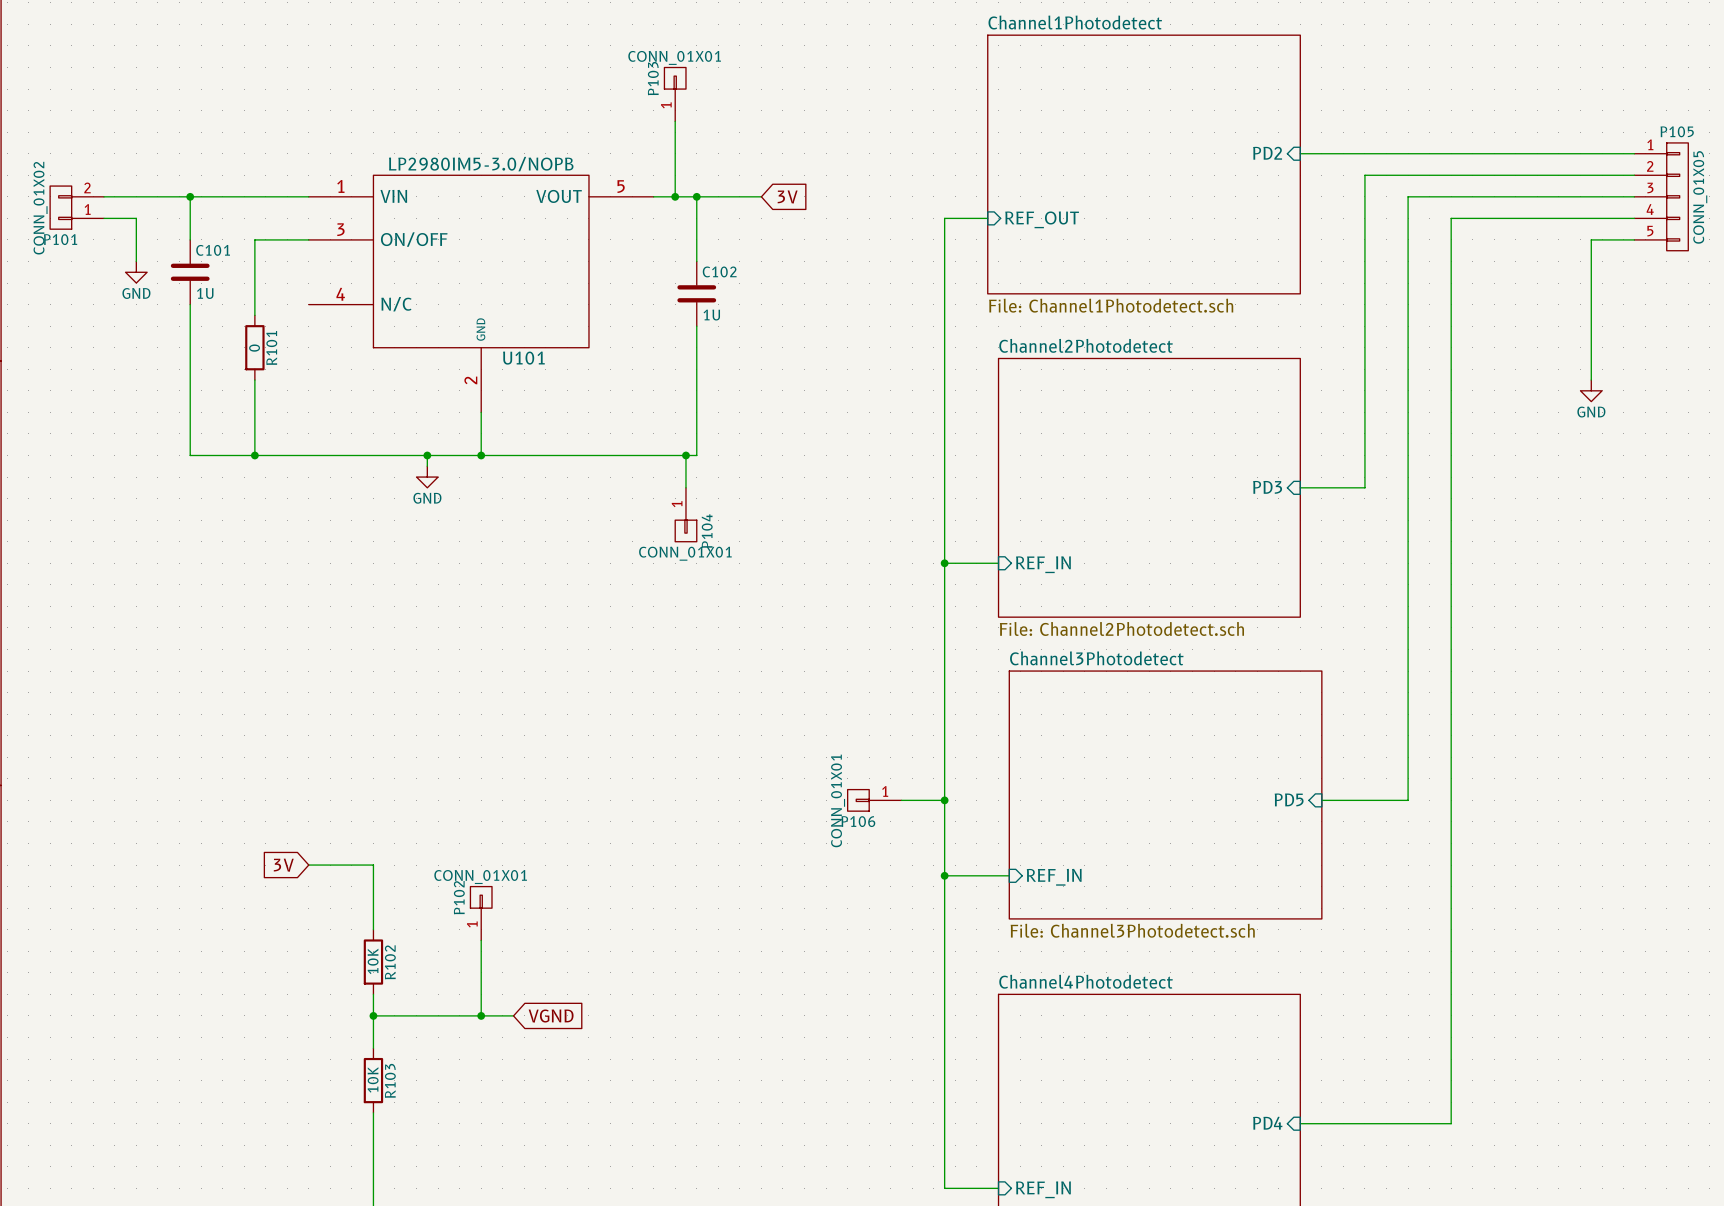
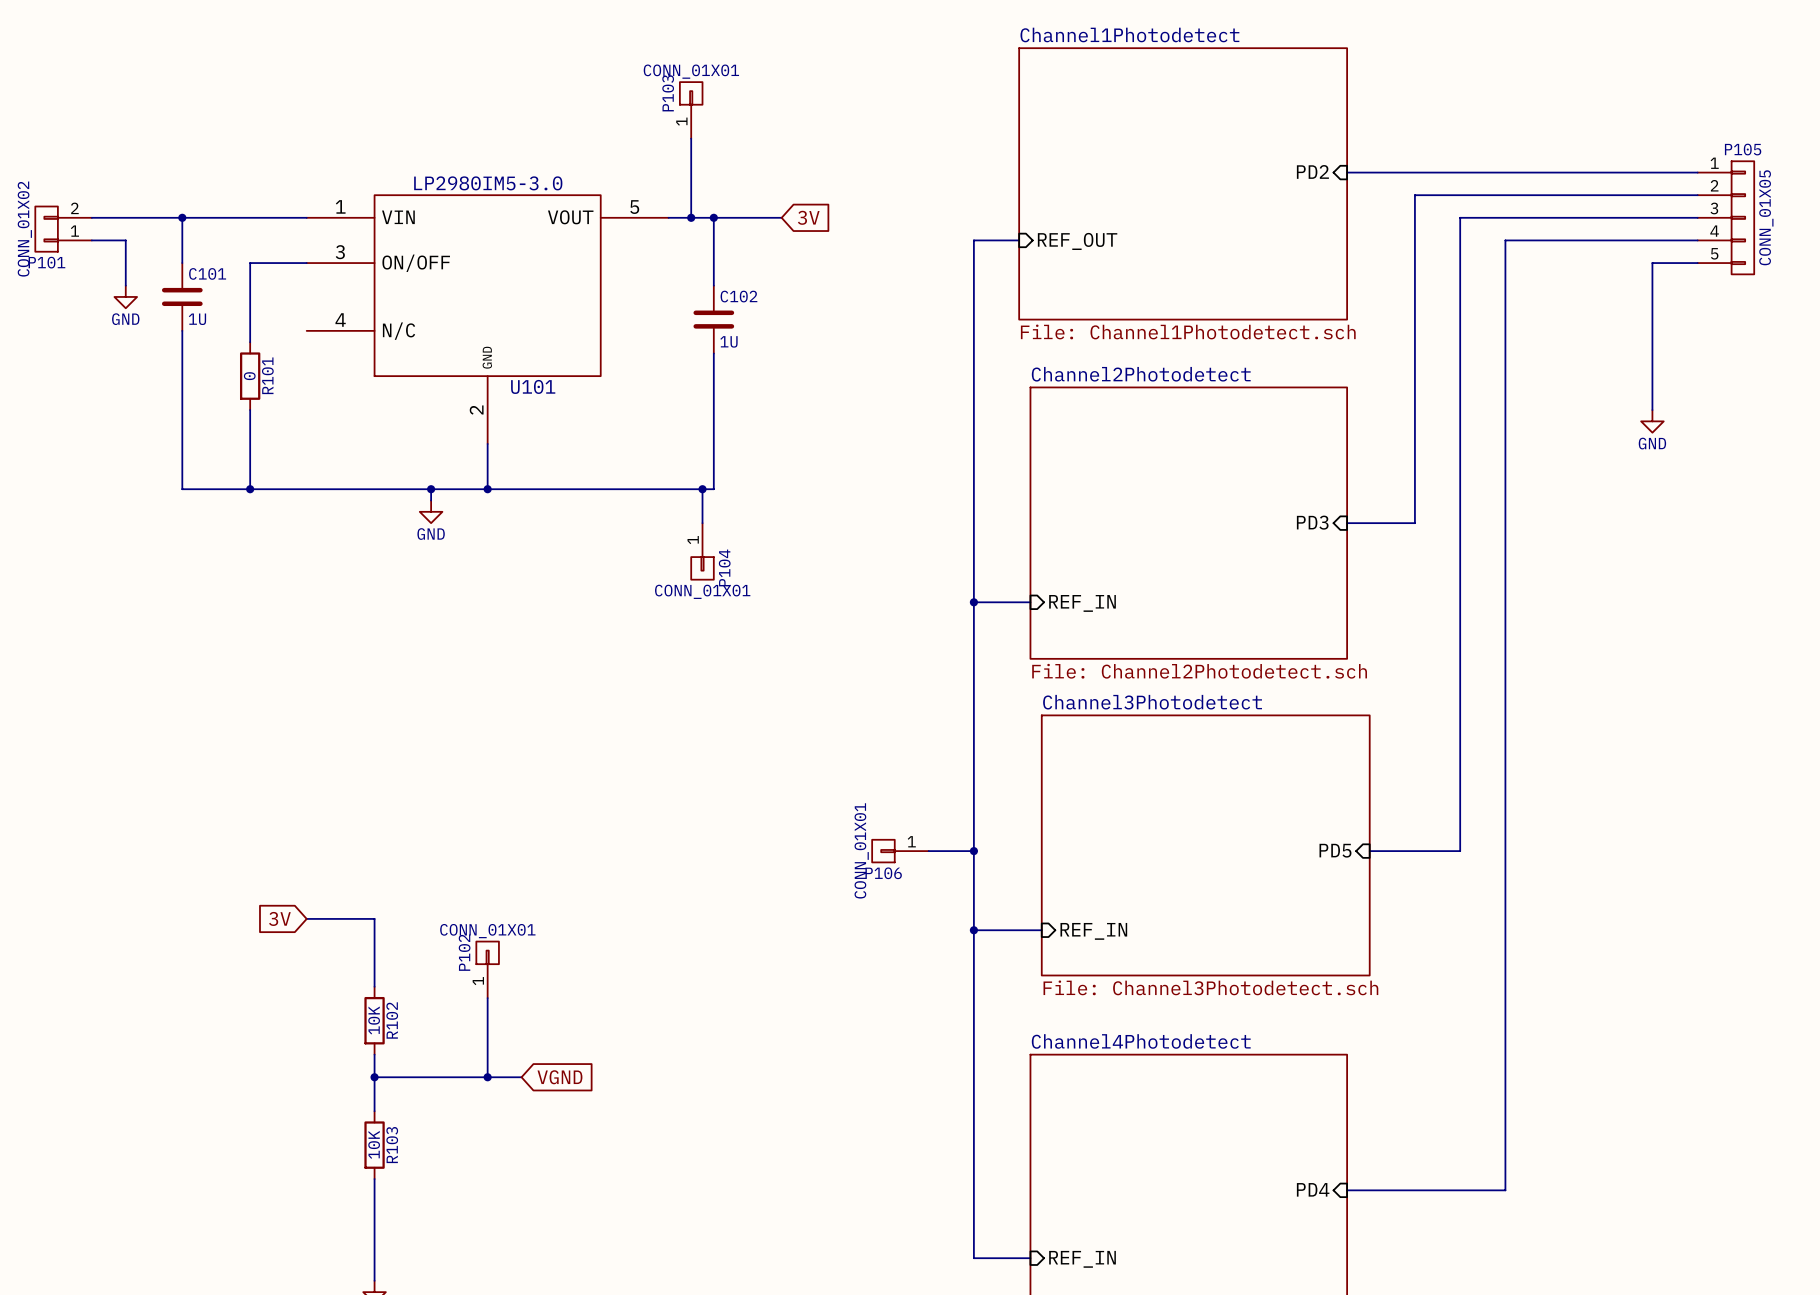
U101 value: LP2980IM5-3.0/NOPB (481, 164) -> LP2980IM5-3.0 (488, 183)

